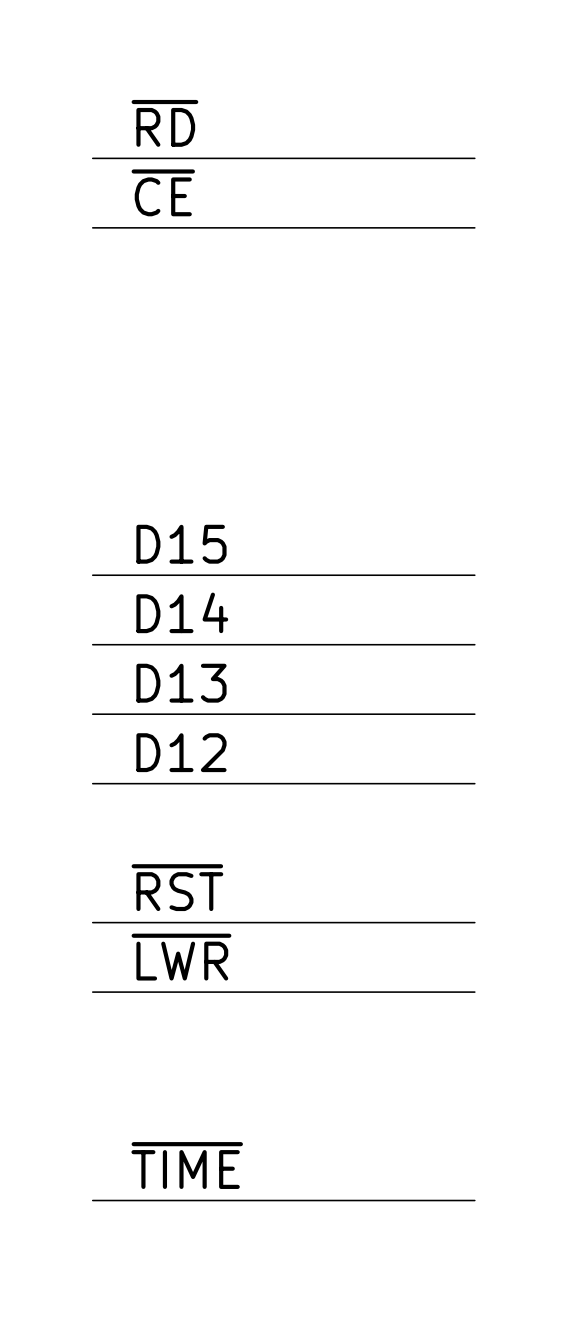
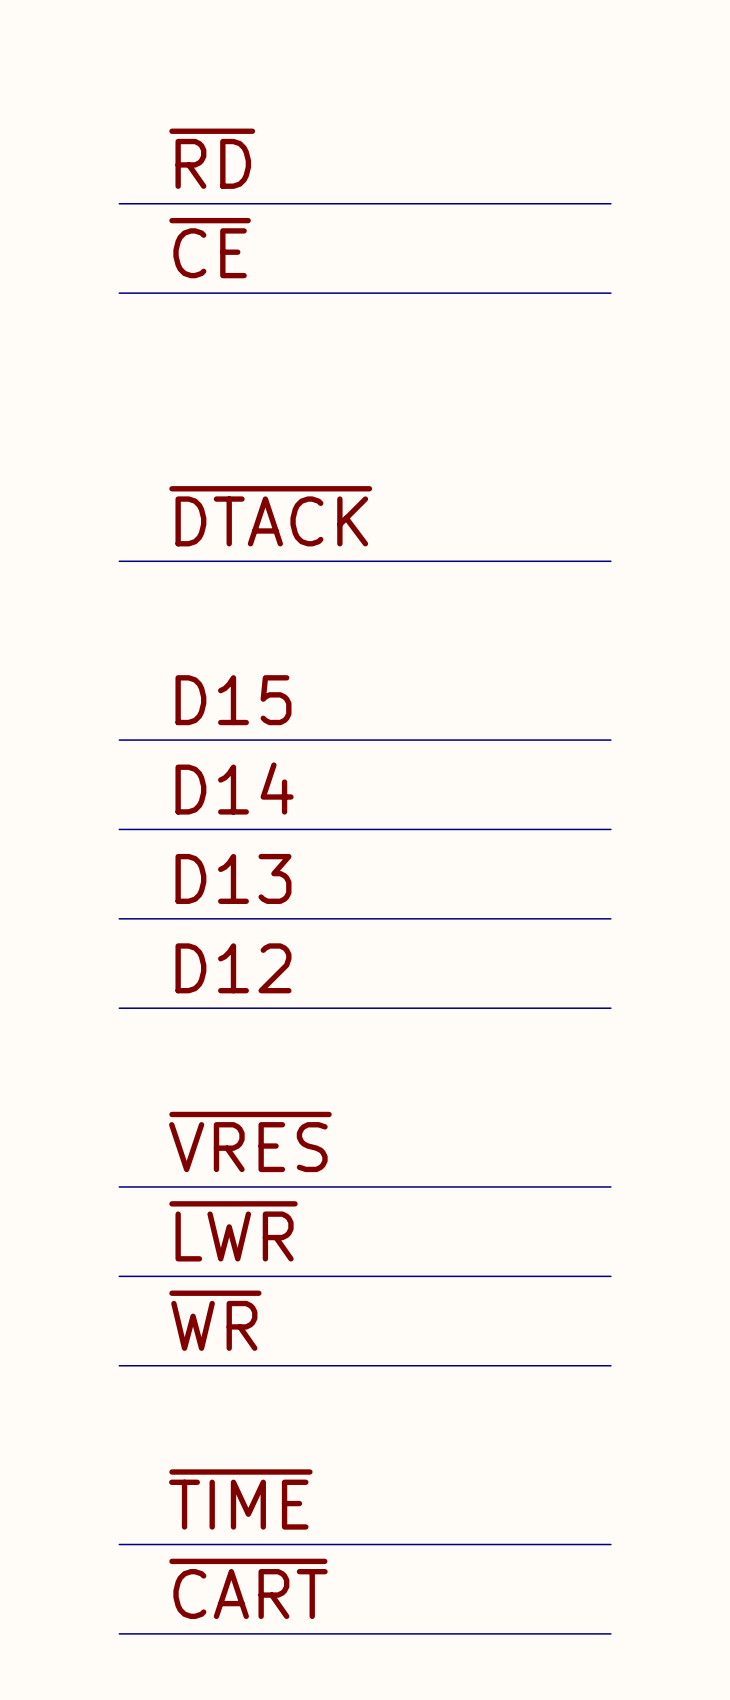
label: none -> ~{DTACK} (270, 516)
wire: none -> (119, 561) (610, 561)
label: ~{RST} (177, 887) -> ~{VRES} (250, 1141)
label: none -> ~{WR} (215, 1320)
wire: none -> (119, 1365) (610, 1365)
label: none -> ~{CART} (248, 1588)
wire: none -> (119, 1633) (610, 1633)

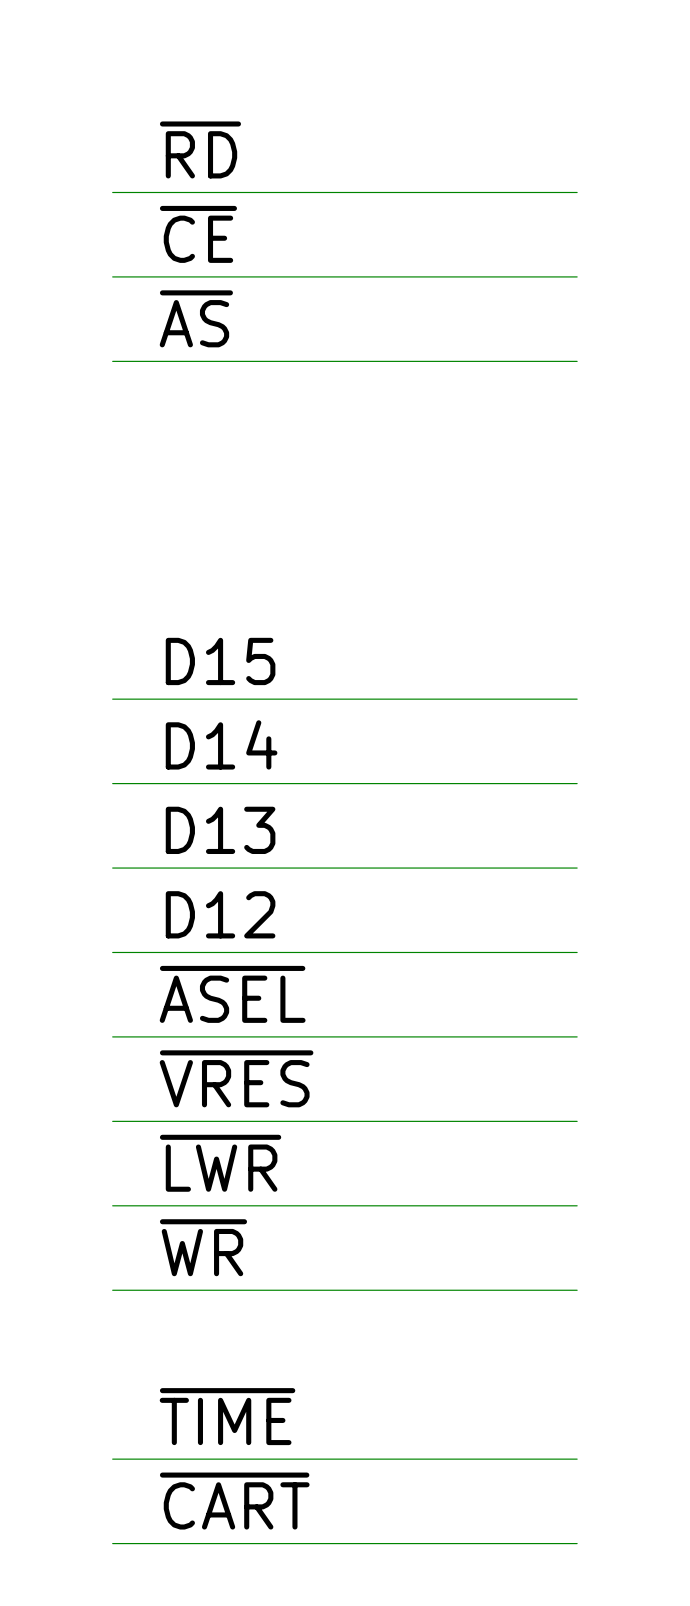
label: none -> ~{AS} (196, 318)
label: ~{DTACK} (270, 516) -> none
wire: (119, 561) (610, 561) -> (112, 361) (577, 361)
label: none -> ~{ASEL} (232, 994)
wire: none -> (112, 1036) (577, 1036)

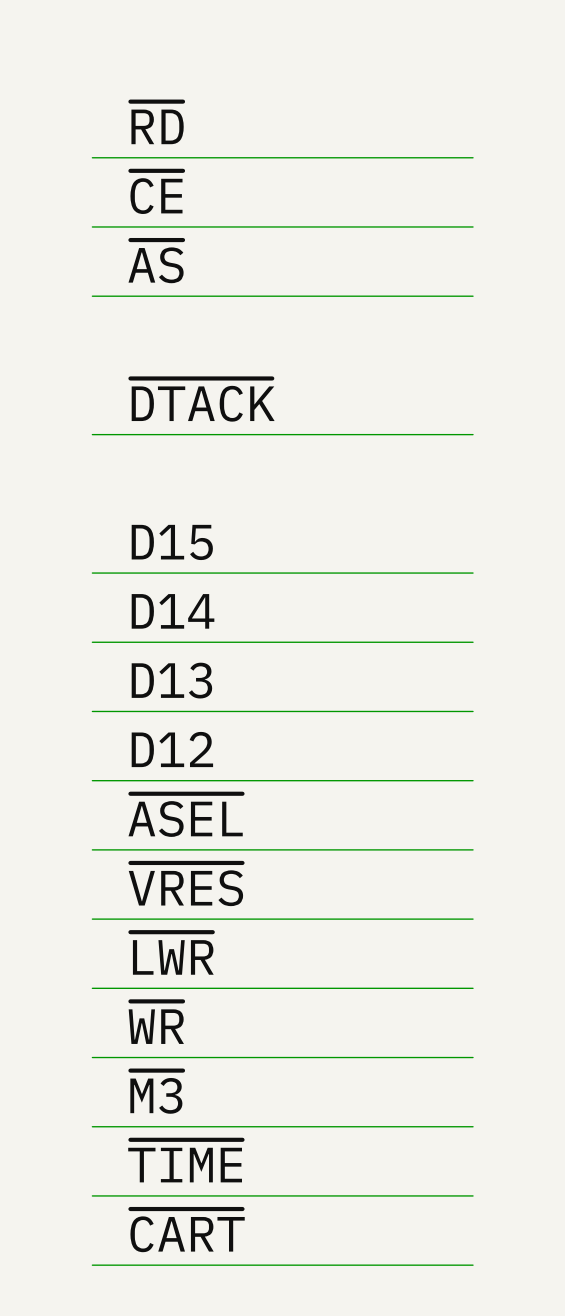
label: none -> ~{DTACK} (202, 400)
wire: none -> (92, 434) (473, 434)
label: none -> ~{M3} (156, 1092)
wire: none -> (92, 1126) (473, 1126)

